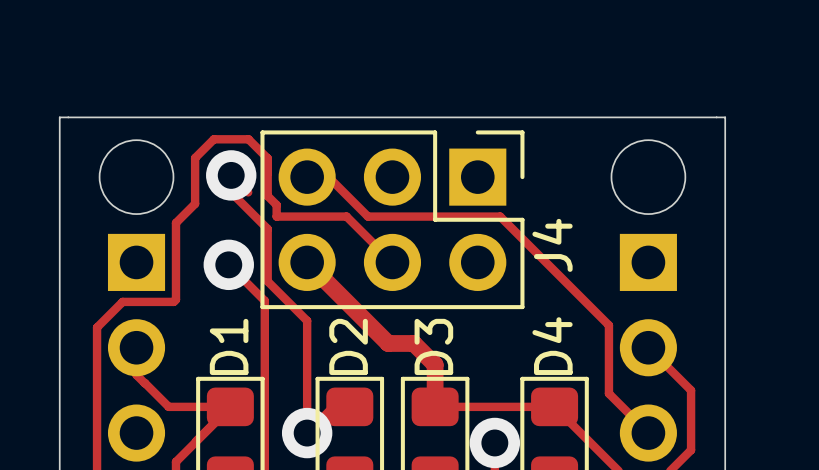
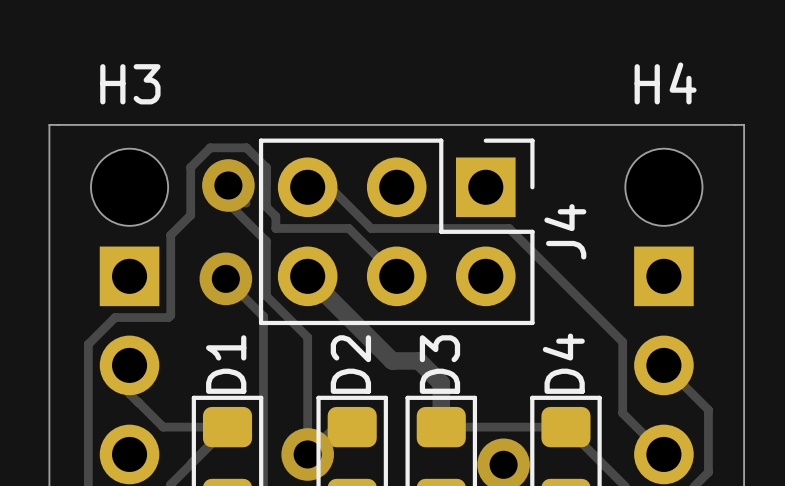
H4 name: none -> H4 (665, 83)
H3 name: none -> H3 (130, 84)
J4 name position: J4 (552, 245) -> J4 (565, 231)

